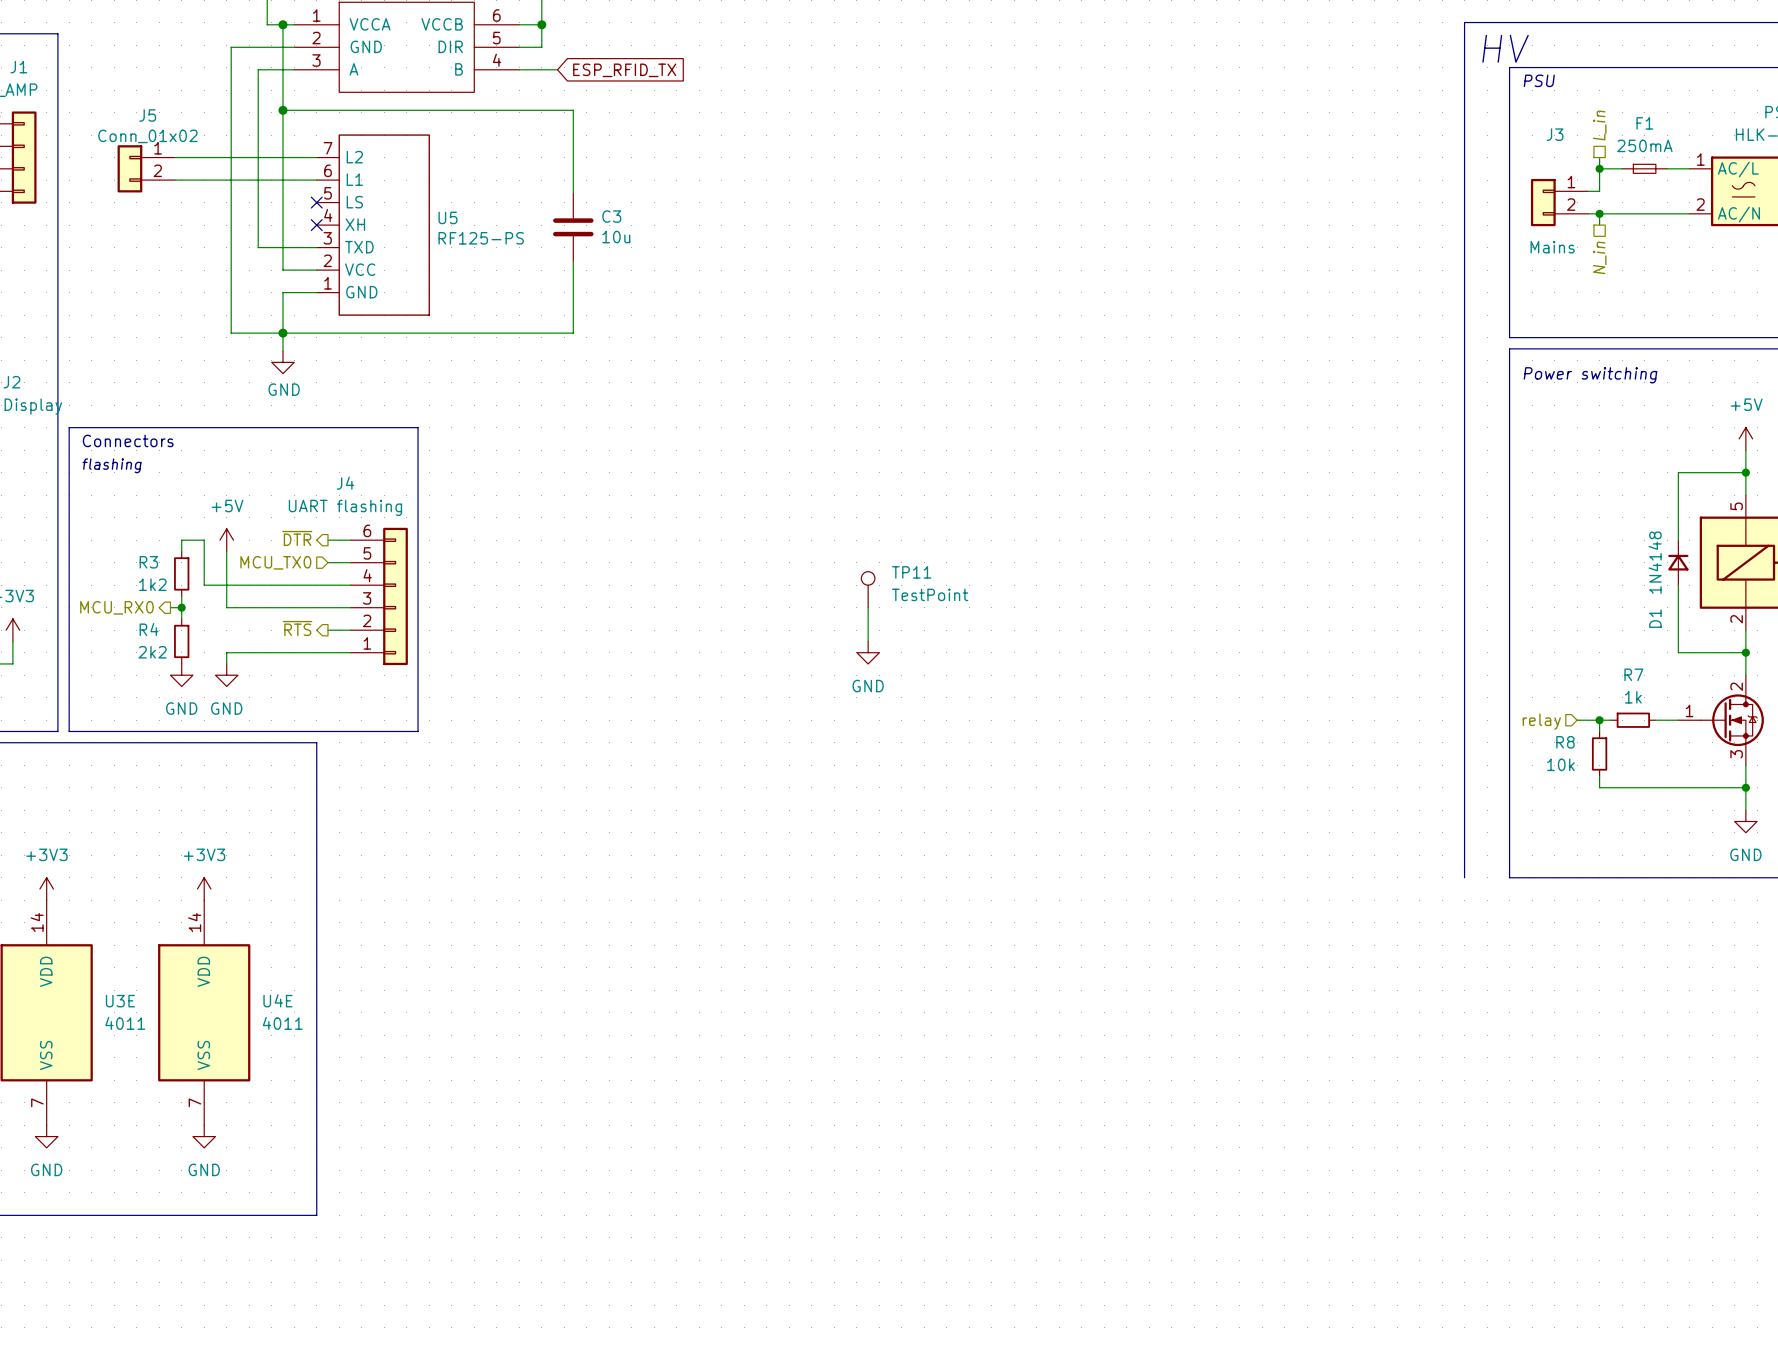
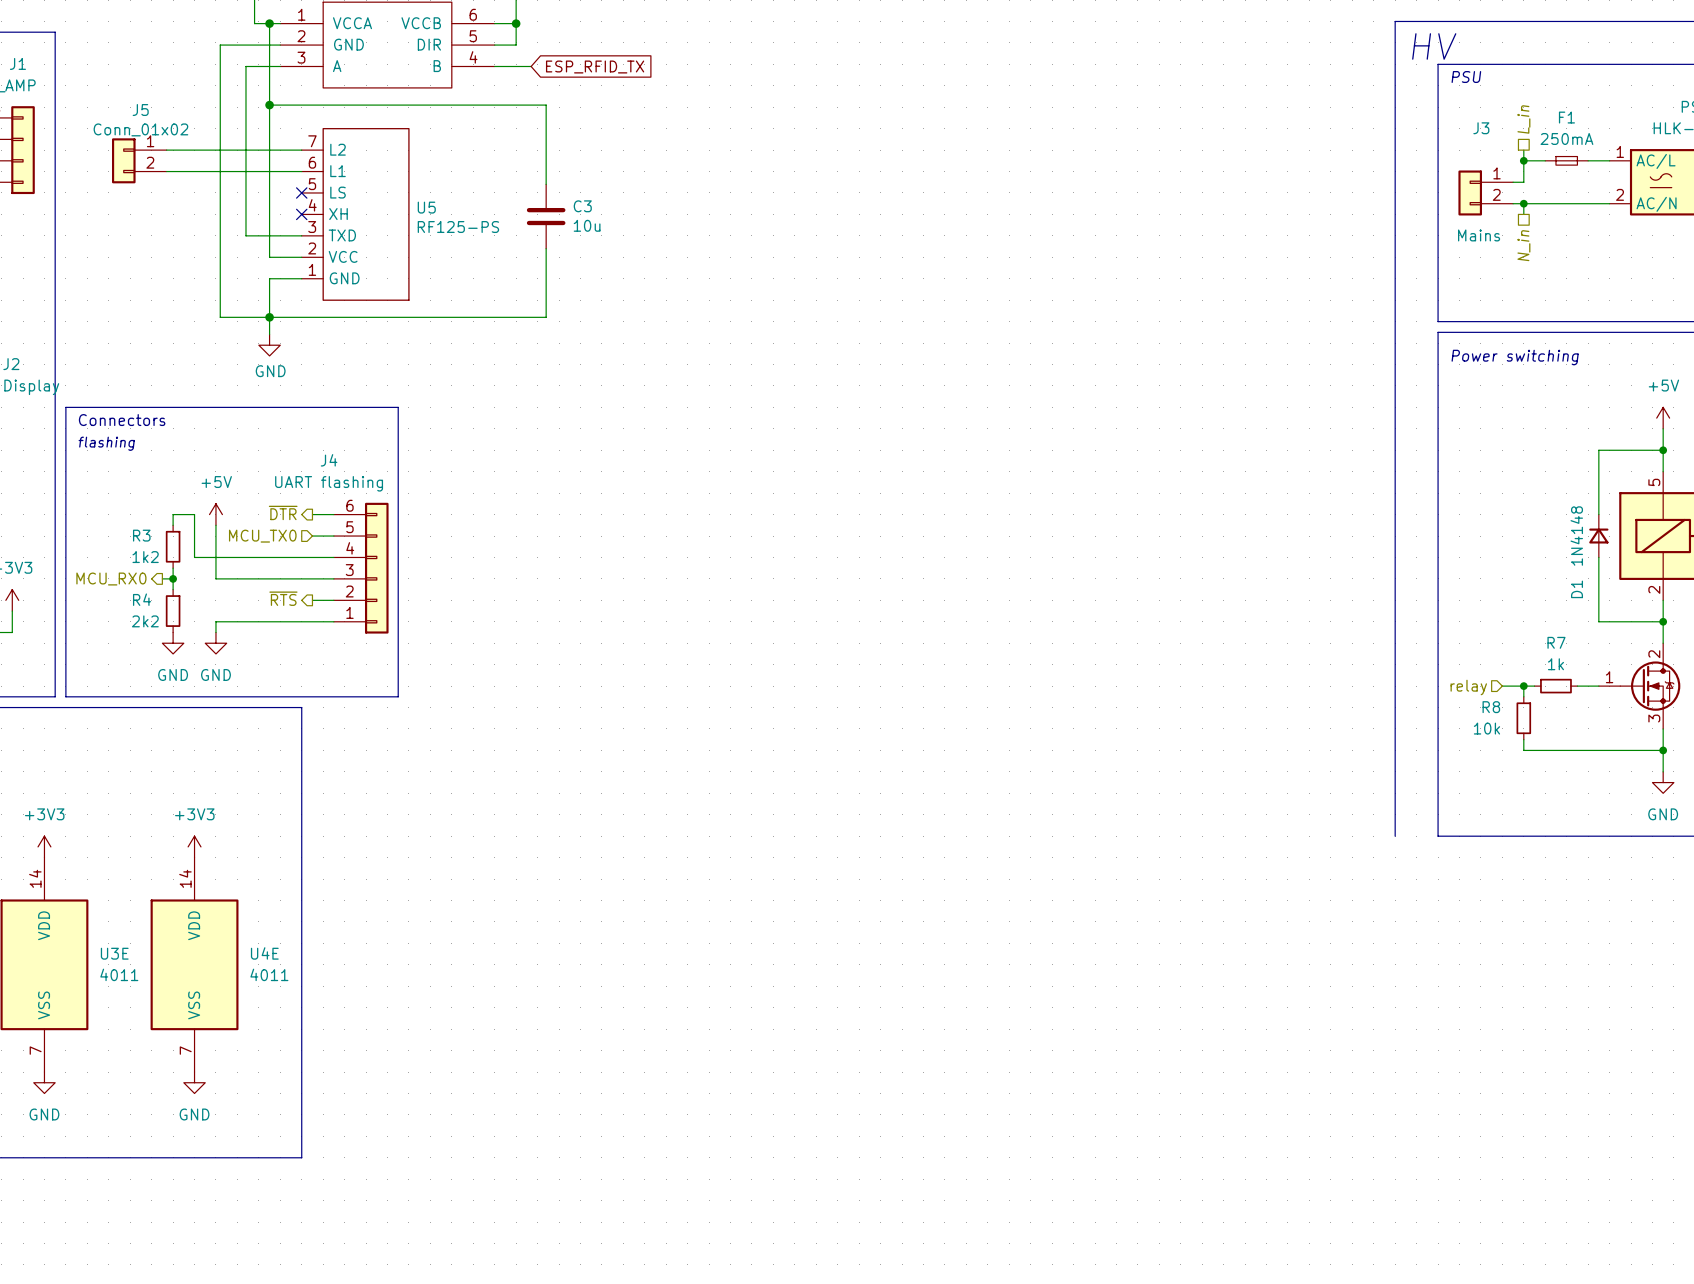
TP11: TestPoint (868, 589) -> none
wire: (868, 607) (868, 641) -> none
power symbol: GND (868, 652) -> none

